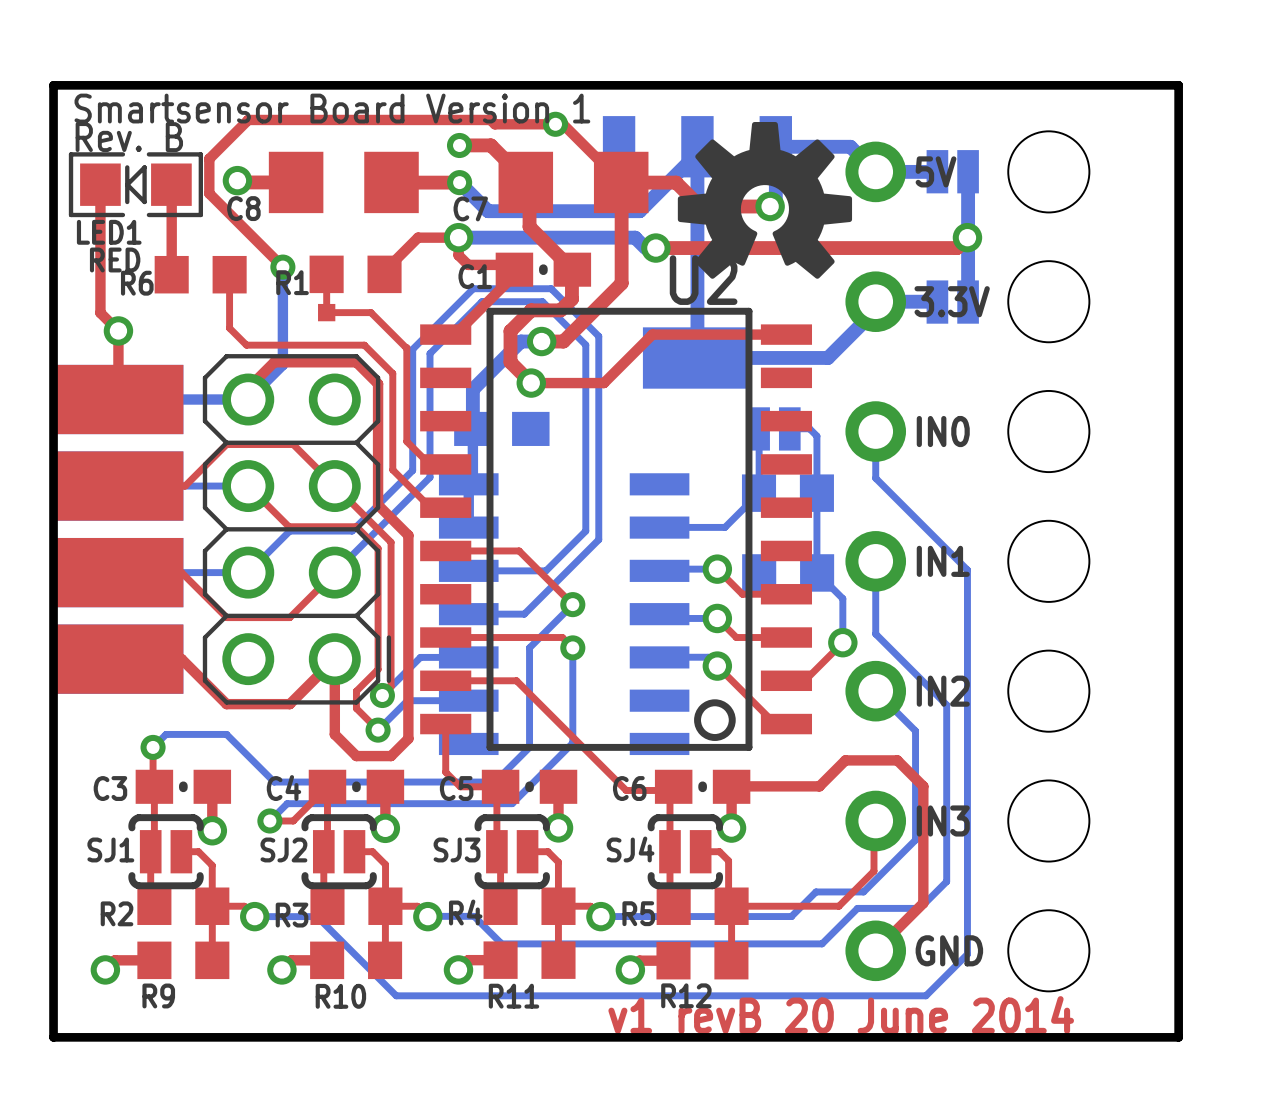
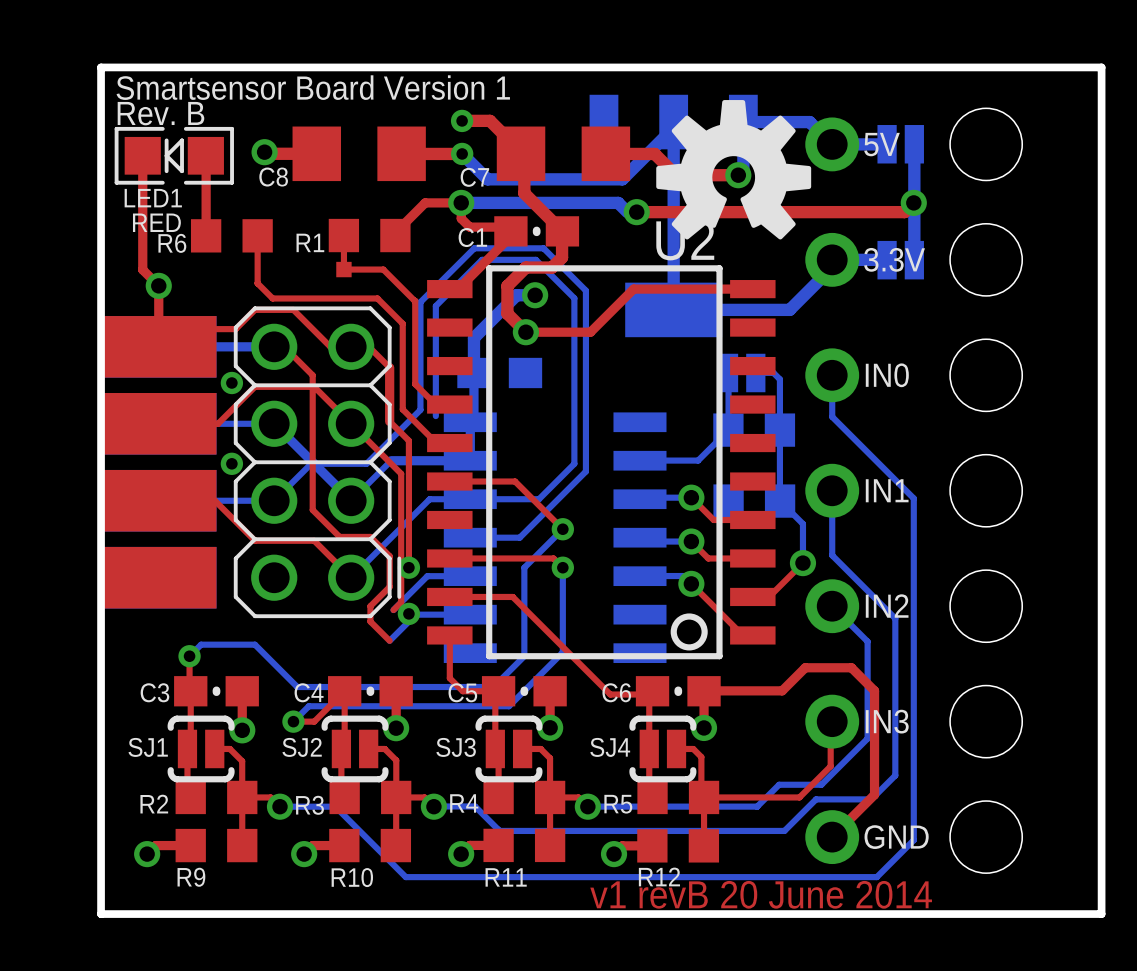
via: (555, 124) -> none
bottom track: (282, 267) (282, 364) (248, 399) -> none
top track: (282, 267) (209, 193) (209, 158) (248, 119) (490, 119) (494, 124) (563, 124) (621, 182) (621, 283) (563, 341) (541, 341) -> none
via: (282, 267) -> none
top track: (248, 399) (248, 388) (274, 362) (356, 362) (378, 383) (378, 422) -> (158, 346) (176, 329) (235, 329) (254, 309) (293, 309) (330, 346) (368, 346) (389, 367)
via: none -> (231, 383)
bottom track: (430, 477) (379, 527) -> (470, 460) (391, 460)
top track: (378, 483) (378, 505) (408, 535) (408, 738) (391, 756) (356, 756) (334, 734) (334, 659) (289, 704) (226, 704) (181, 659) (150, 659) -> (389, 421) (408, 440) (408, 567)
bottom track: none -> (274, 423) (351, 500)
top track: (248, 486) (288, 526) (356, 526) (378, 548) (378, 634) -> (274, 346) (284, 346) (312, 375) (312, 509) (339, 536) (370, 536) (389, 556)
via: none -> (231, 463)
bottom track: none -> (470, 499) (429, 499) (351, 577)
top track: (334, 572) (289, 617) -> (351, 577) (314, 540) (311, 540)
via: none -> (408, 567)
via position: (382, 695) -> (408, 613)
via: (378, 730) -> none

